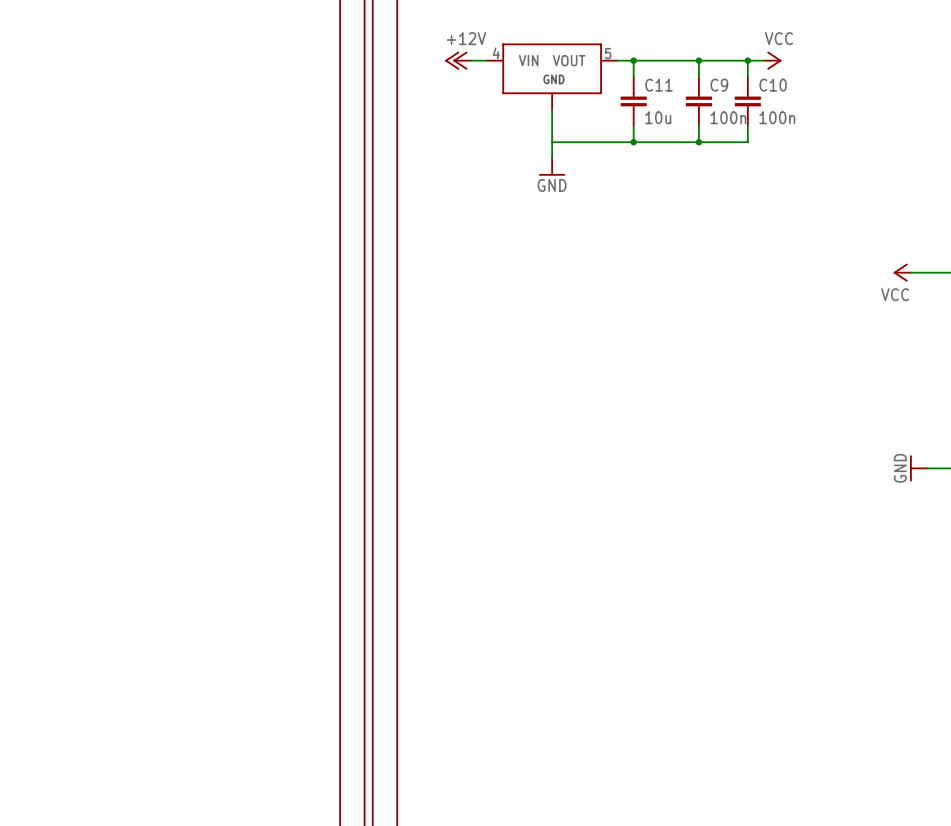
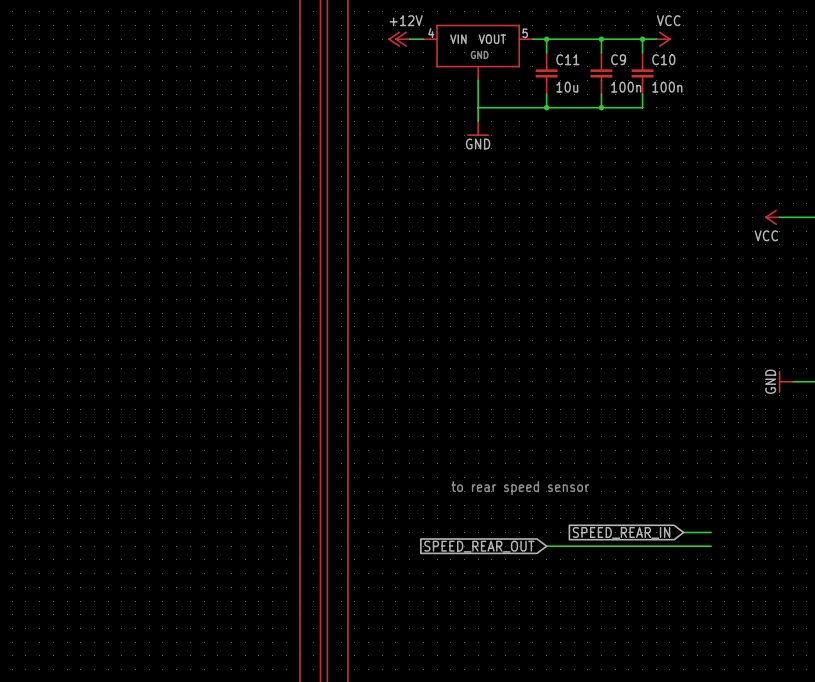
text: none -> to rear speed sensor (520, 488)
wire: none -> (683, 532) (711, 532)
global label: none -> SPEED_REAR_IN (621, 532)
global label: none -> SPEED_REAR_OUT (479, 546)
wire: none -> (546, 546) (711, 546)

